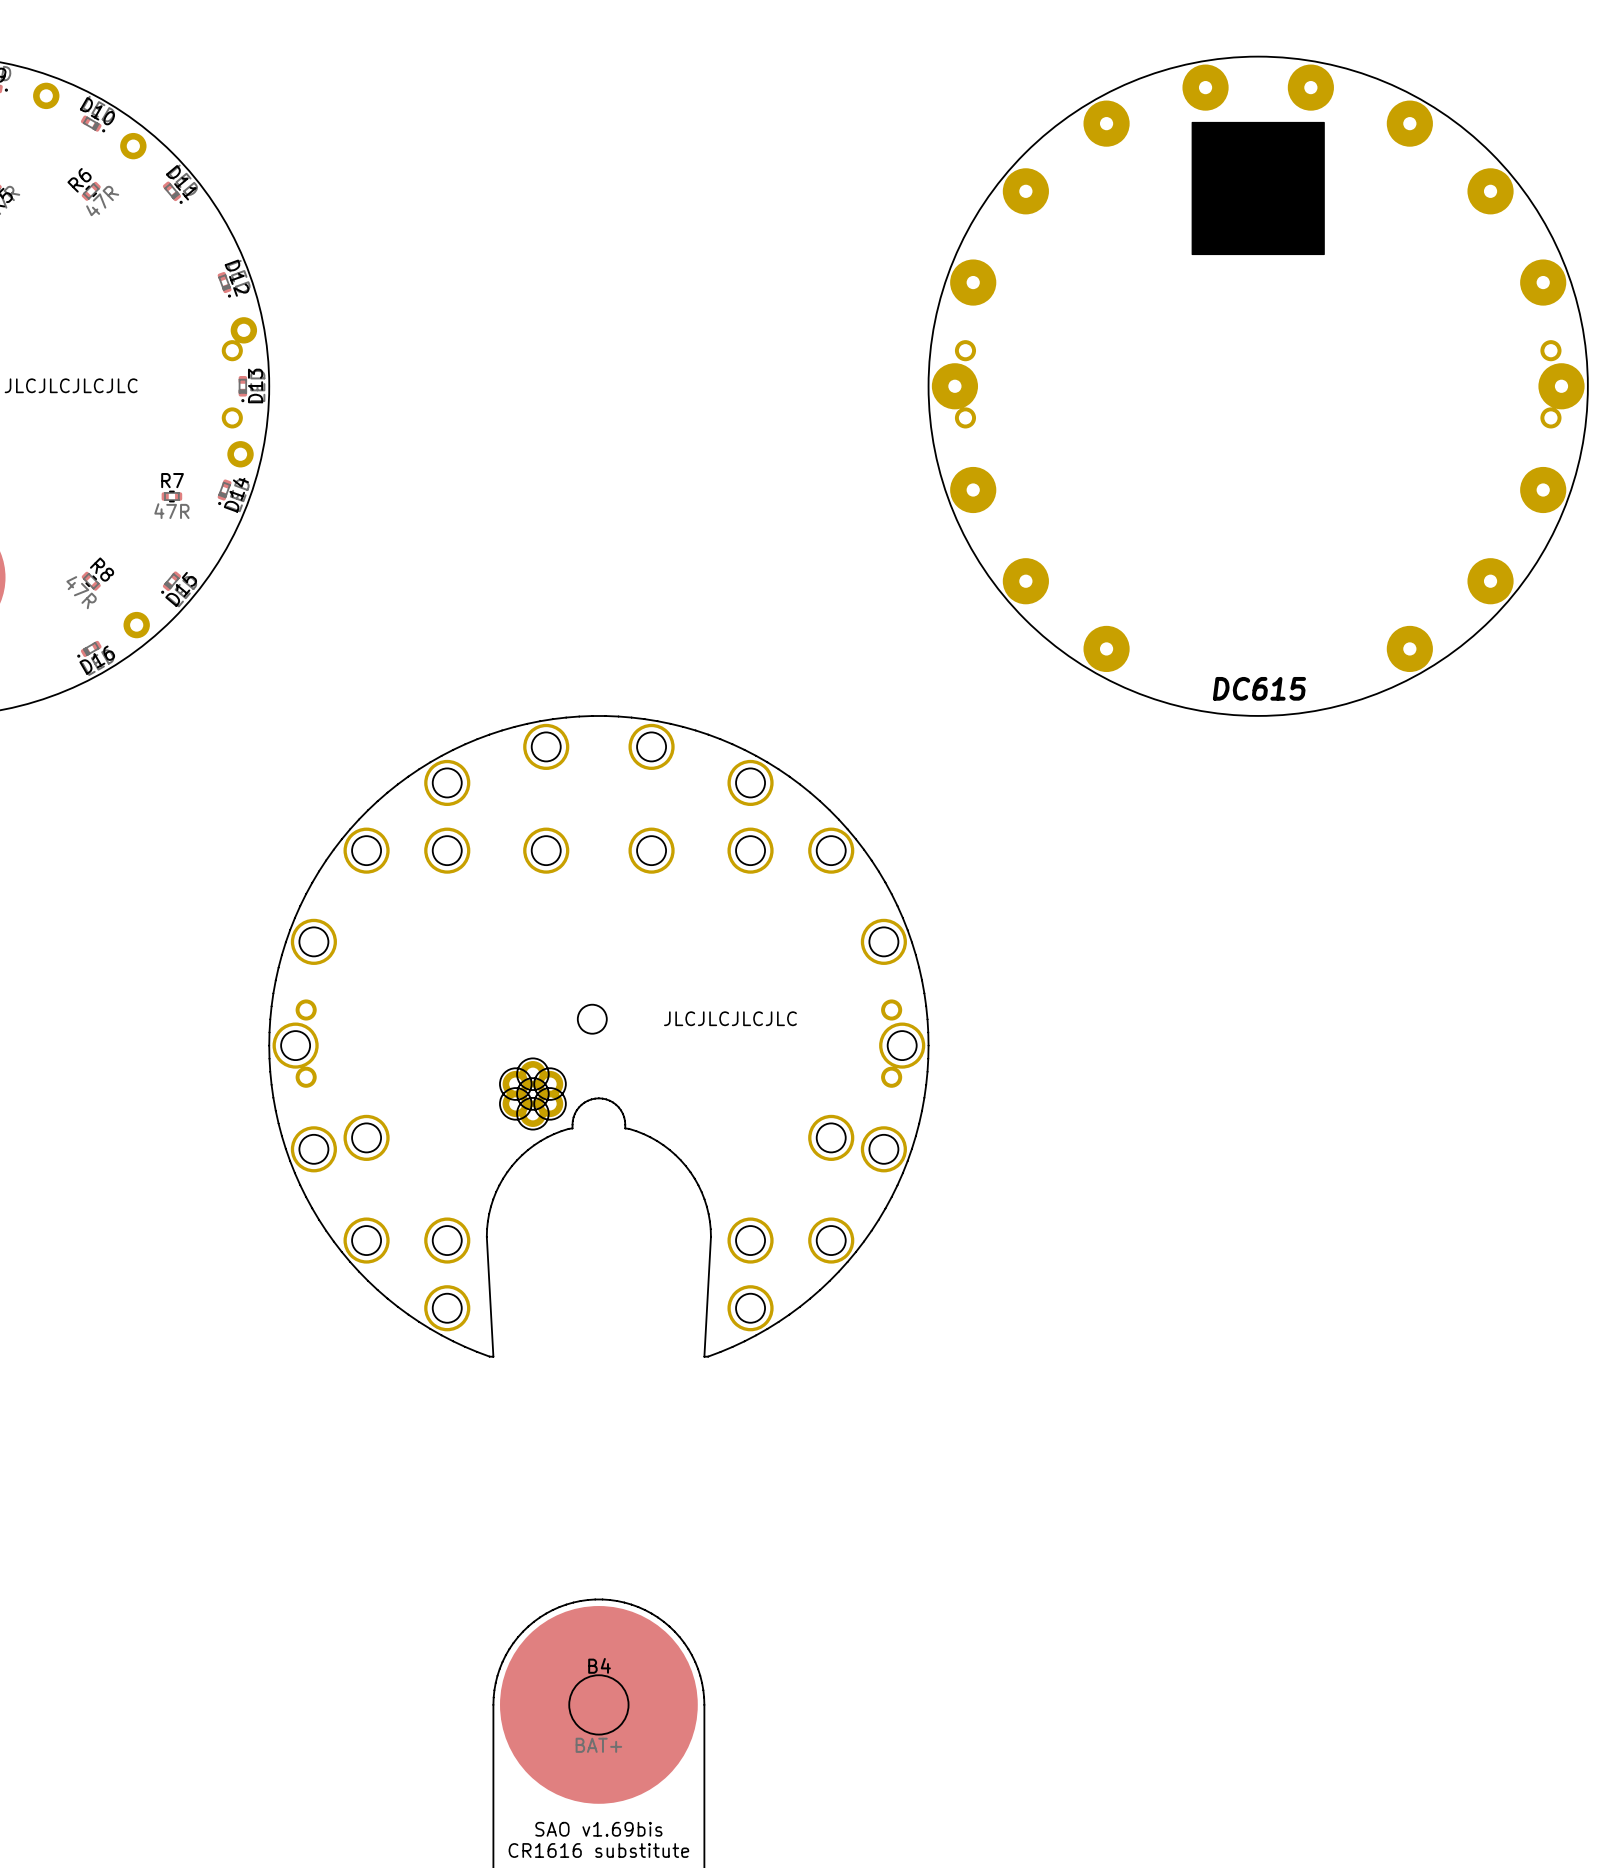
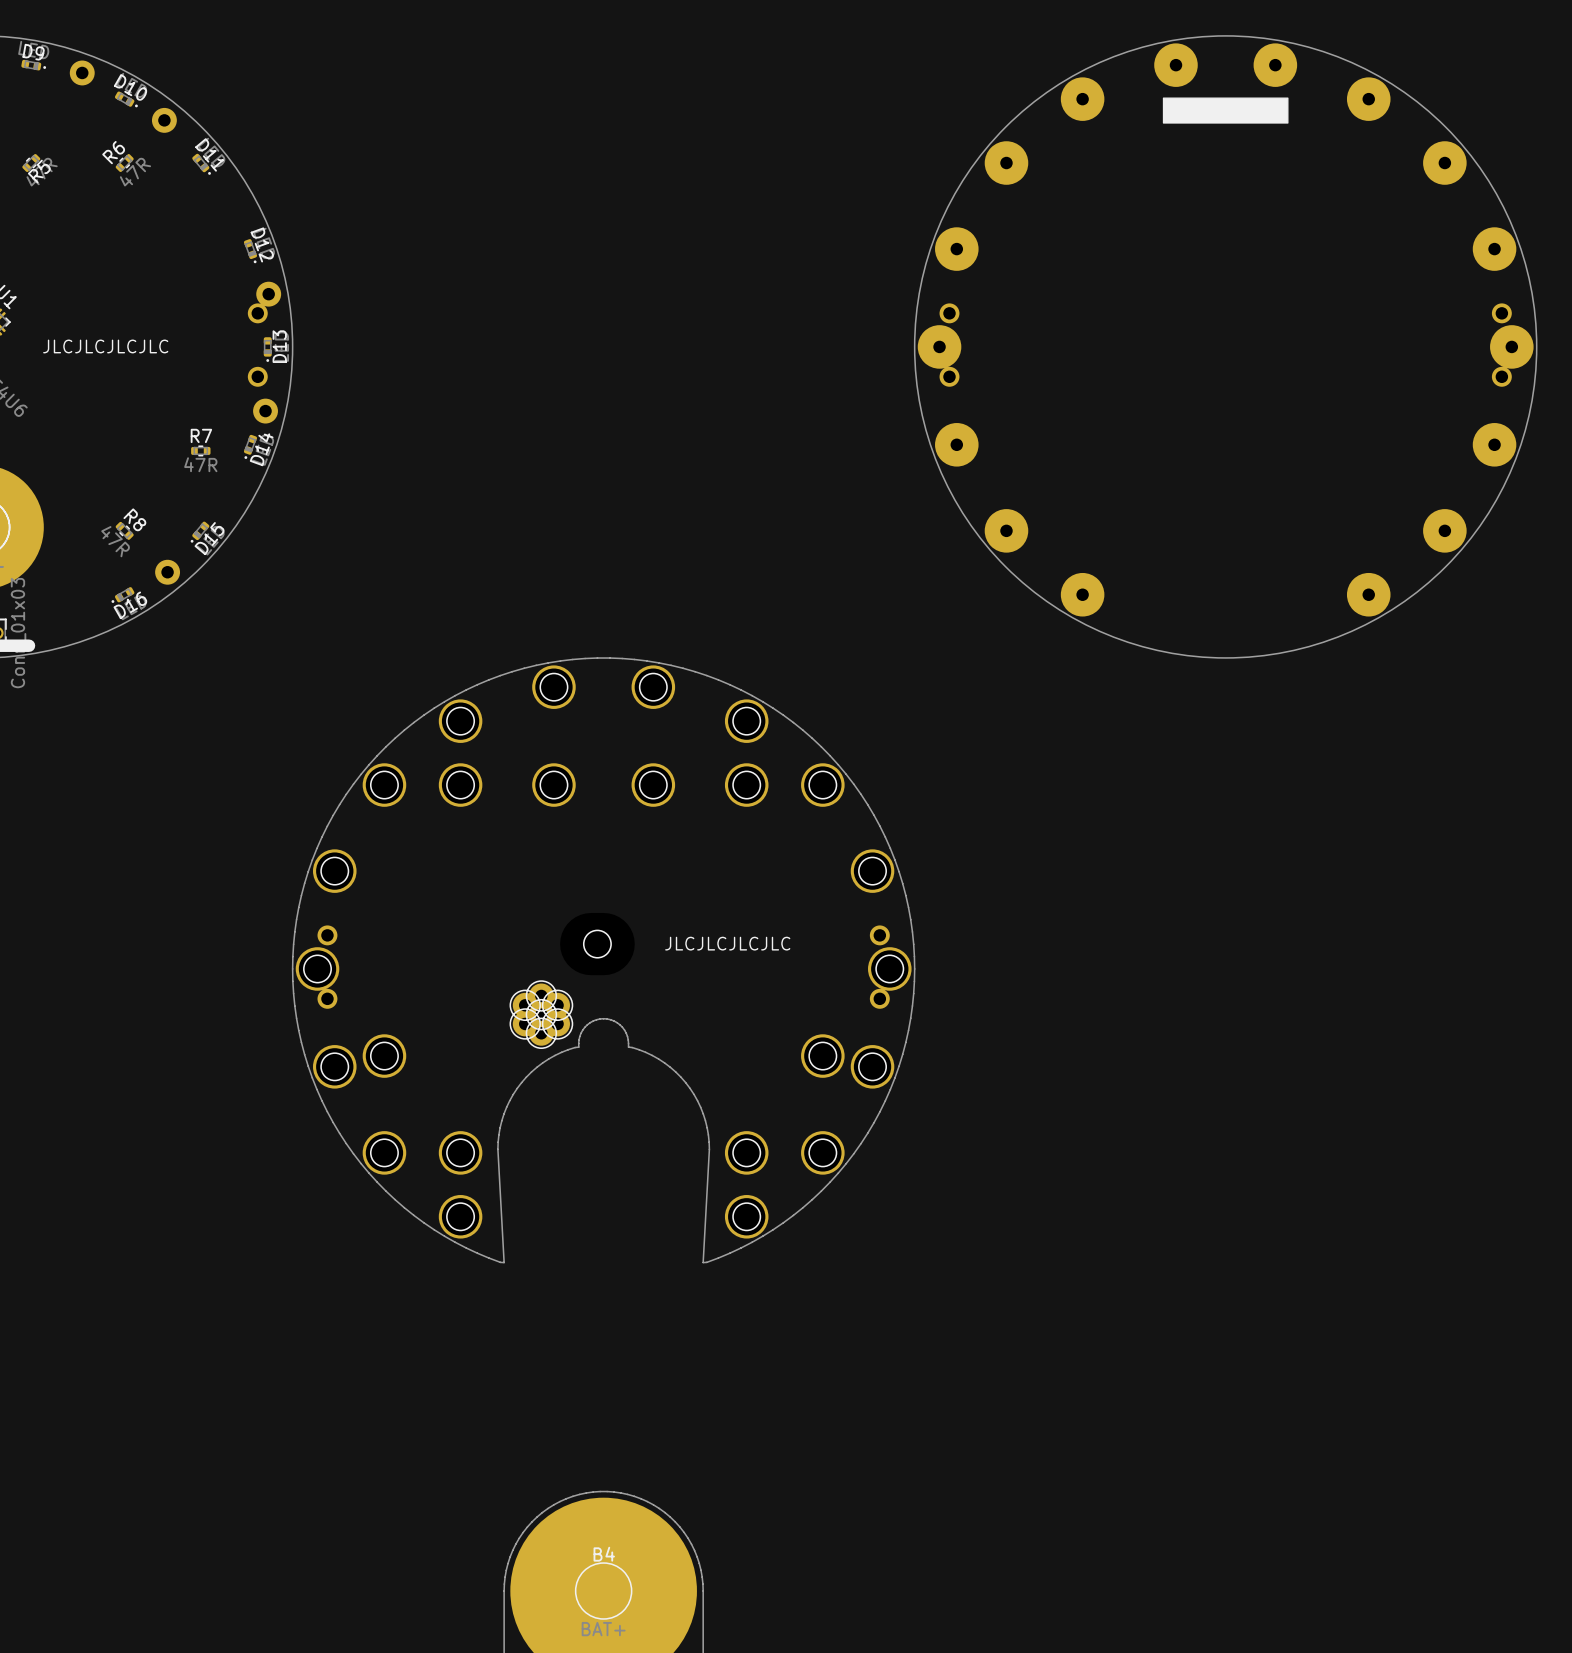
drawing: [1191, 121, 1325, 256] -> none
drawing: none -> [1162, 97, 1289, 124]
text: DC615 (1259, 688) -> none

